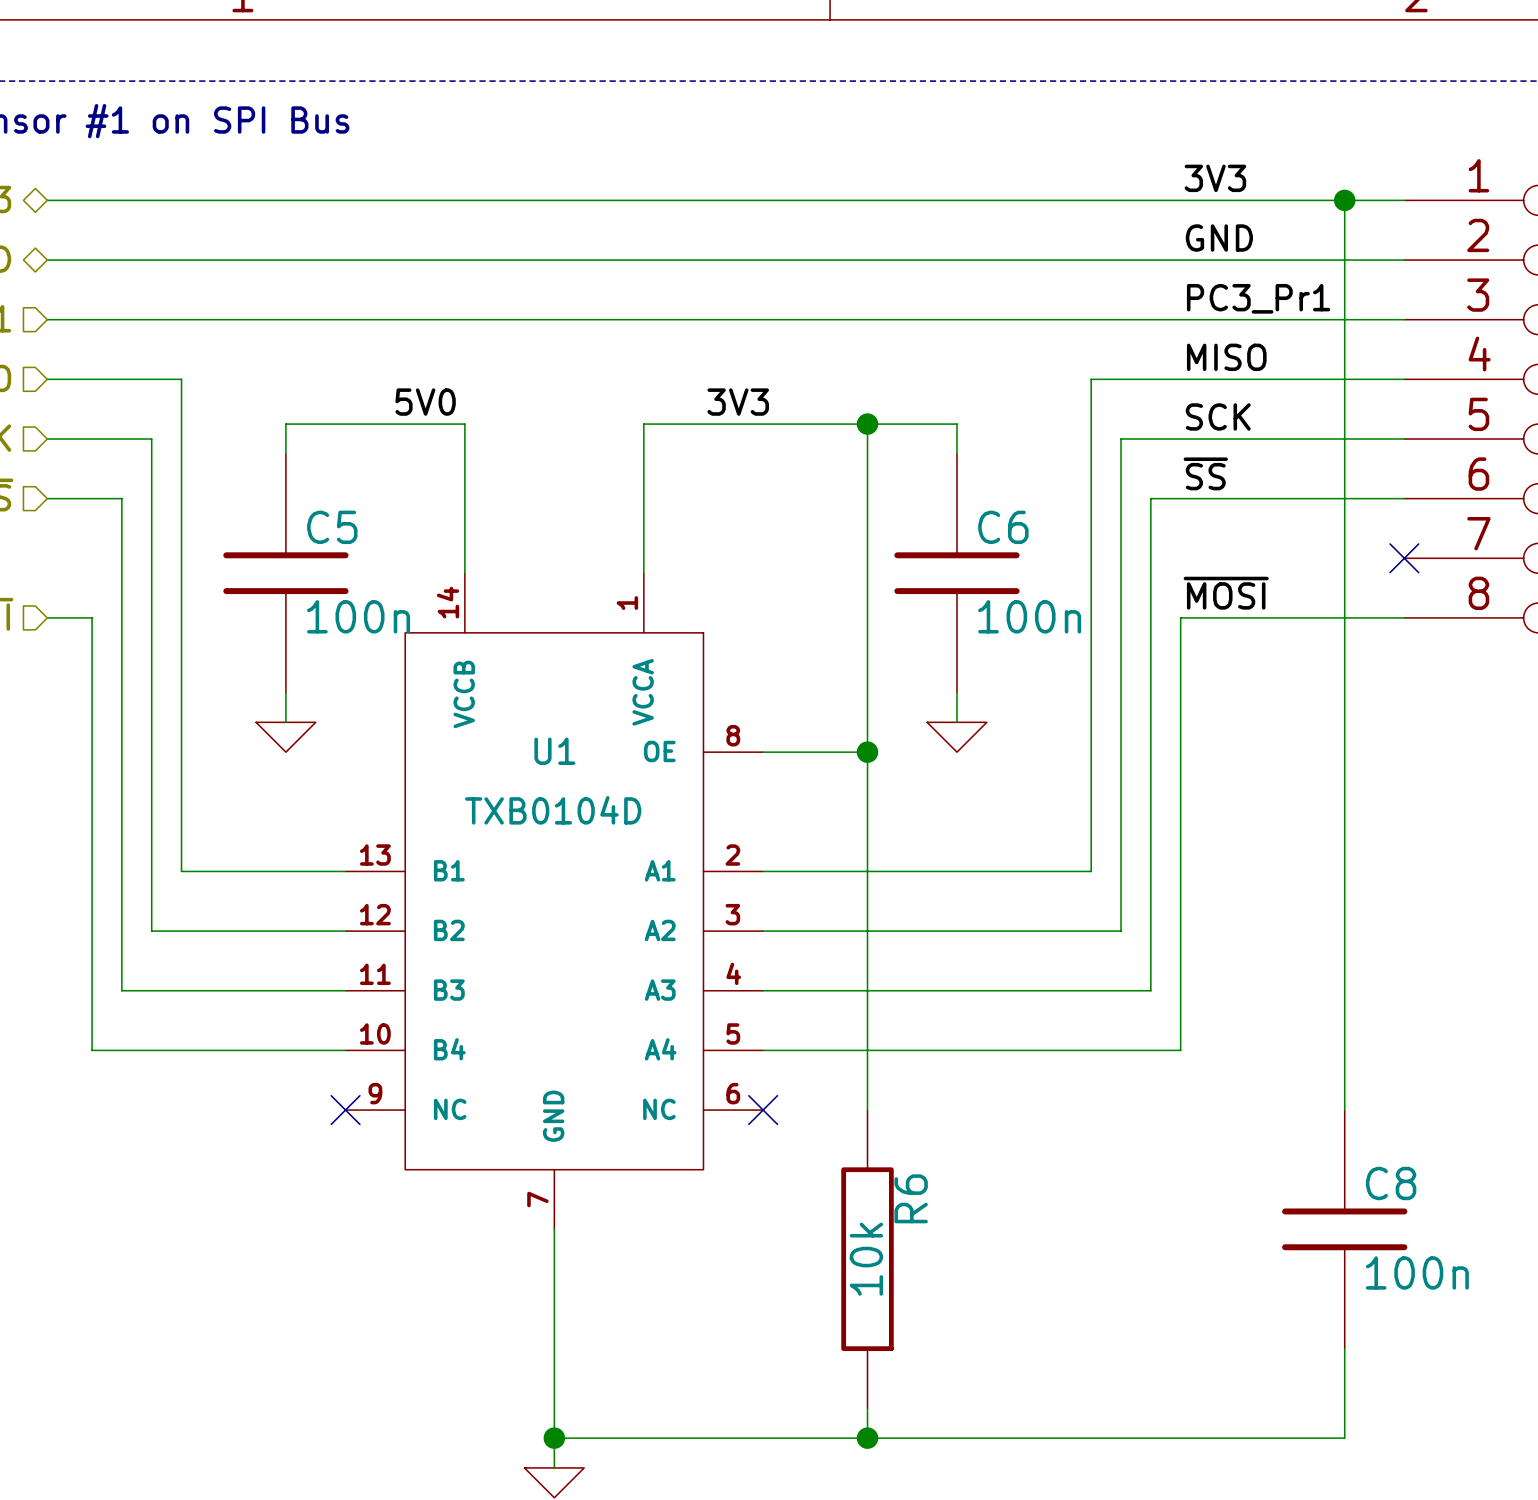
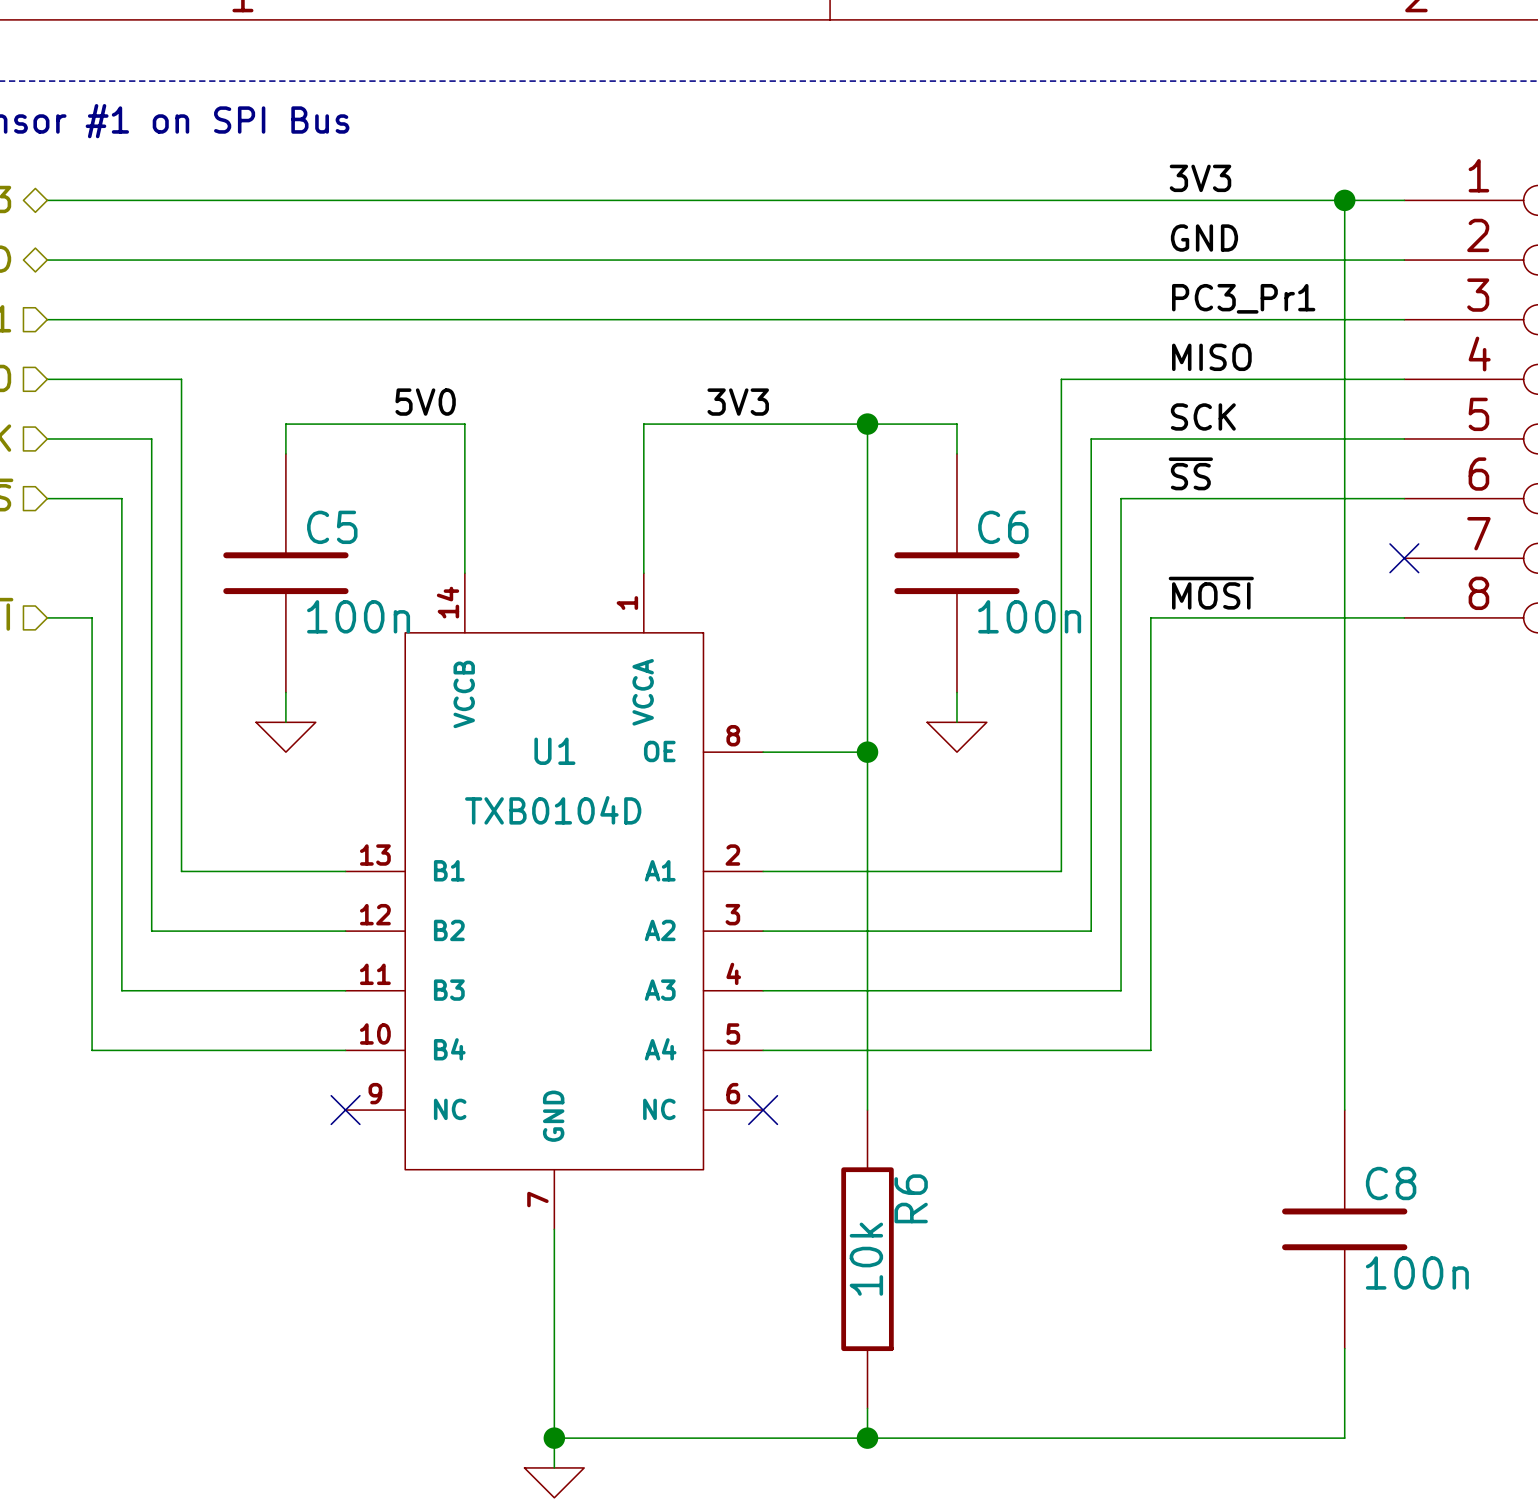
label position: 3V3 (1215, 178) -> 3V3 (1200, 178)
label position: GND (1219, 238) -> GND (1204, 238)
label position: PC3_Pr1 (1258, 298) -> PC3_Pr1 (1243, 298)
label position: MISO (1226, 357) -> MISO (1211, 357)
wire: (1091, 379) (1091, 438) -> (1121, 438) (1091, 438)
label position: SCK (1218, 416) -> SCK (1203, 416)
wire: (1121, 438) (1121, 498) -> (1150, 498) (1121, 498)
label position: ~{SS} (1205, 473) -> ~{SS} (1190, 473)
wire: (1150, 498) (1150, 617) -> (1180, 617) (1150, 617)
label position: ~{MOSI} (1226, 593) -> ~{MOSI} (1211, 593)
wire: (1180, 617) (1180, 1050) (1150, 1050) -> none
wire: (1061, 871) (1091, 871) -> (1061, 871) (1061, 379) (1091, 379)
wire: (1091, 931) (1121, 931) -> (1091, 931) (1091, 871)
wire: none -> (1121, 931) (1121, 990)
wire: (1121, 990) (1150, 990) -> (1150, 1050) (1150, 990)

